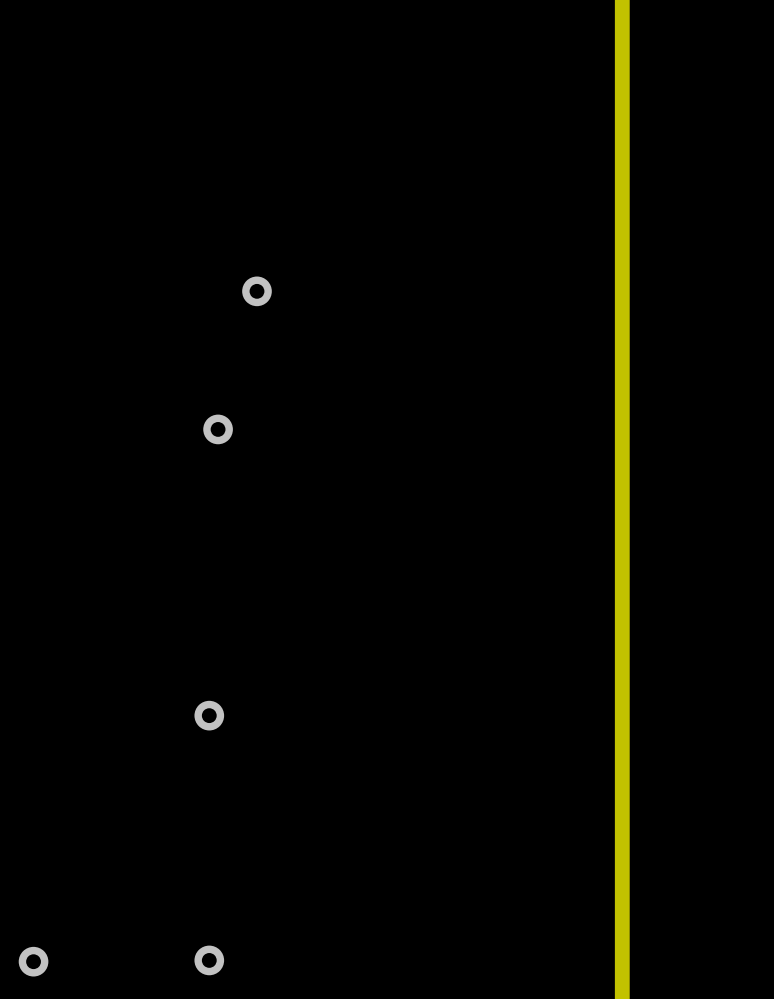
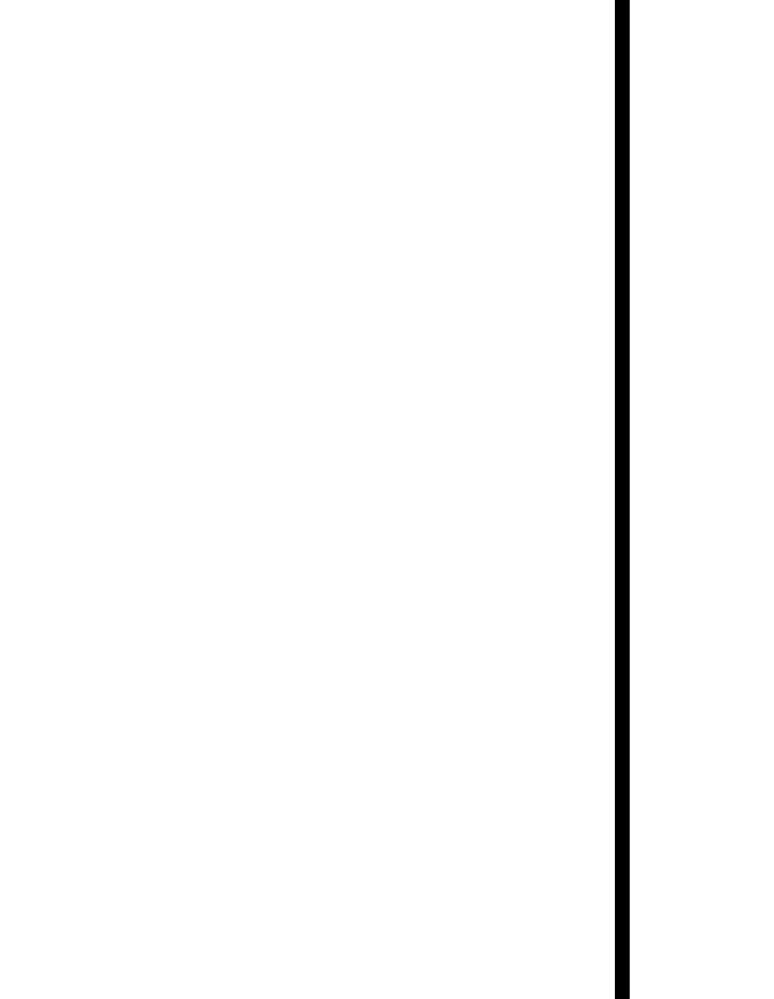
via: (256, 291) -> none
via: (218, 429) -> none
via: (209, 715) -> none
via: (209, 960) -> none
via: (33, 961) -> none

